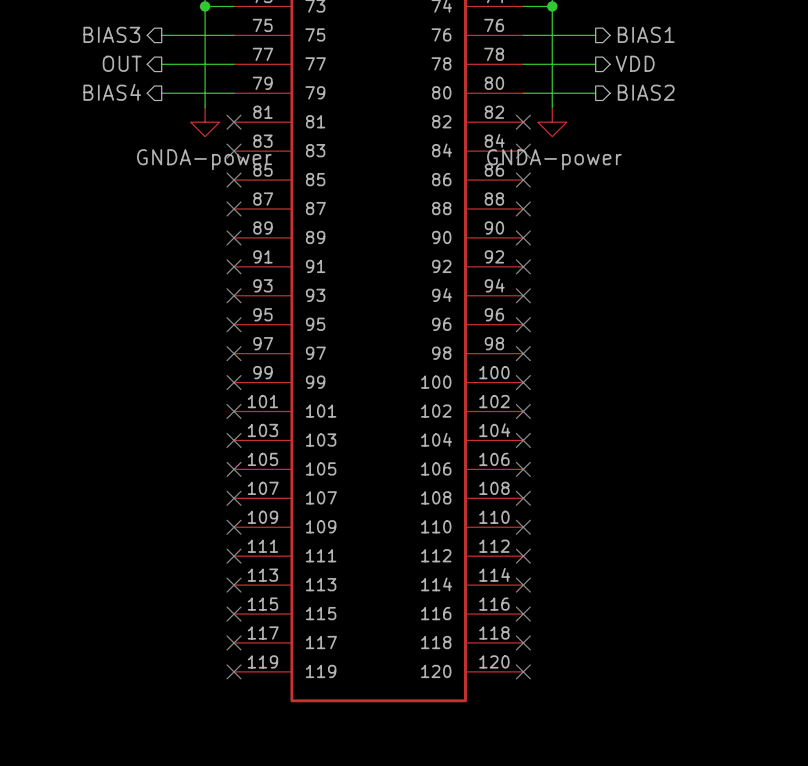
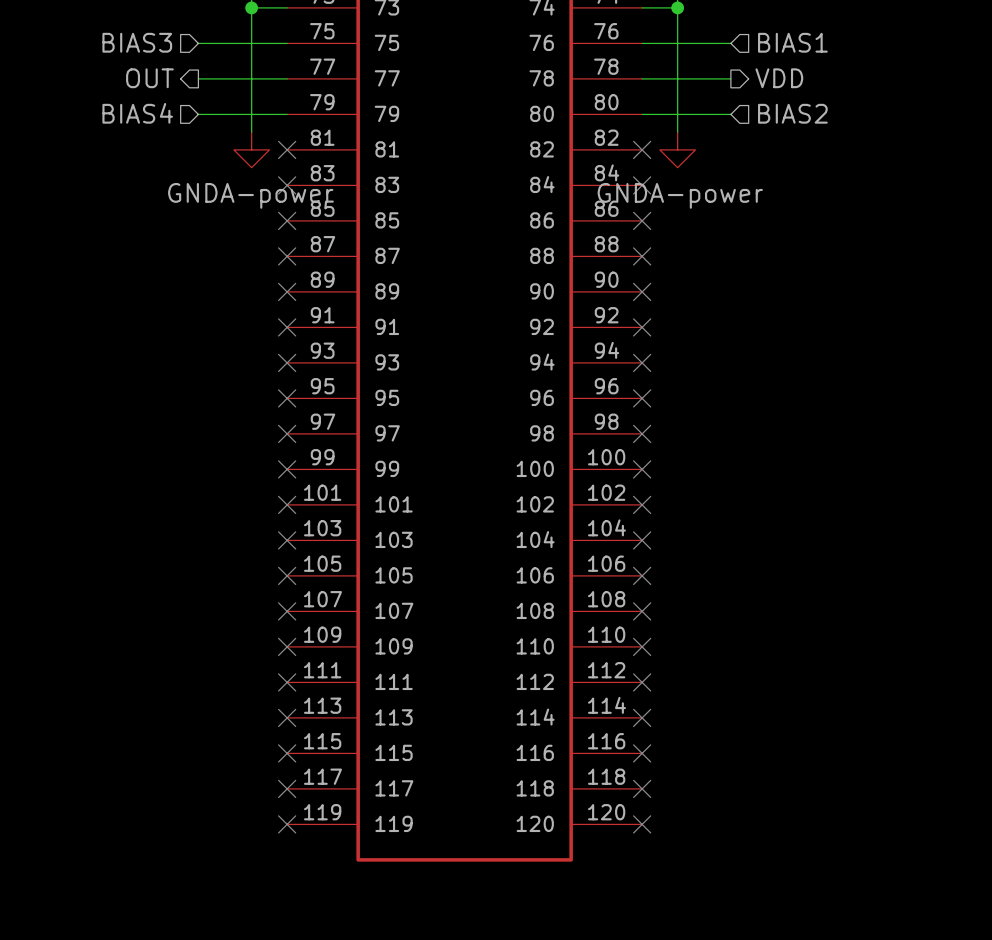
hierarchical label shape: output (111, 34) -> input (137, 42)
hierarchical label shape: output (646, 34) -> input (792, 42)
hierarchical label shape: output (112, 92) -> input (137, 113)
hierarchical label shape: output (646, 92) -> input (792, 113)

